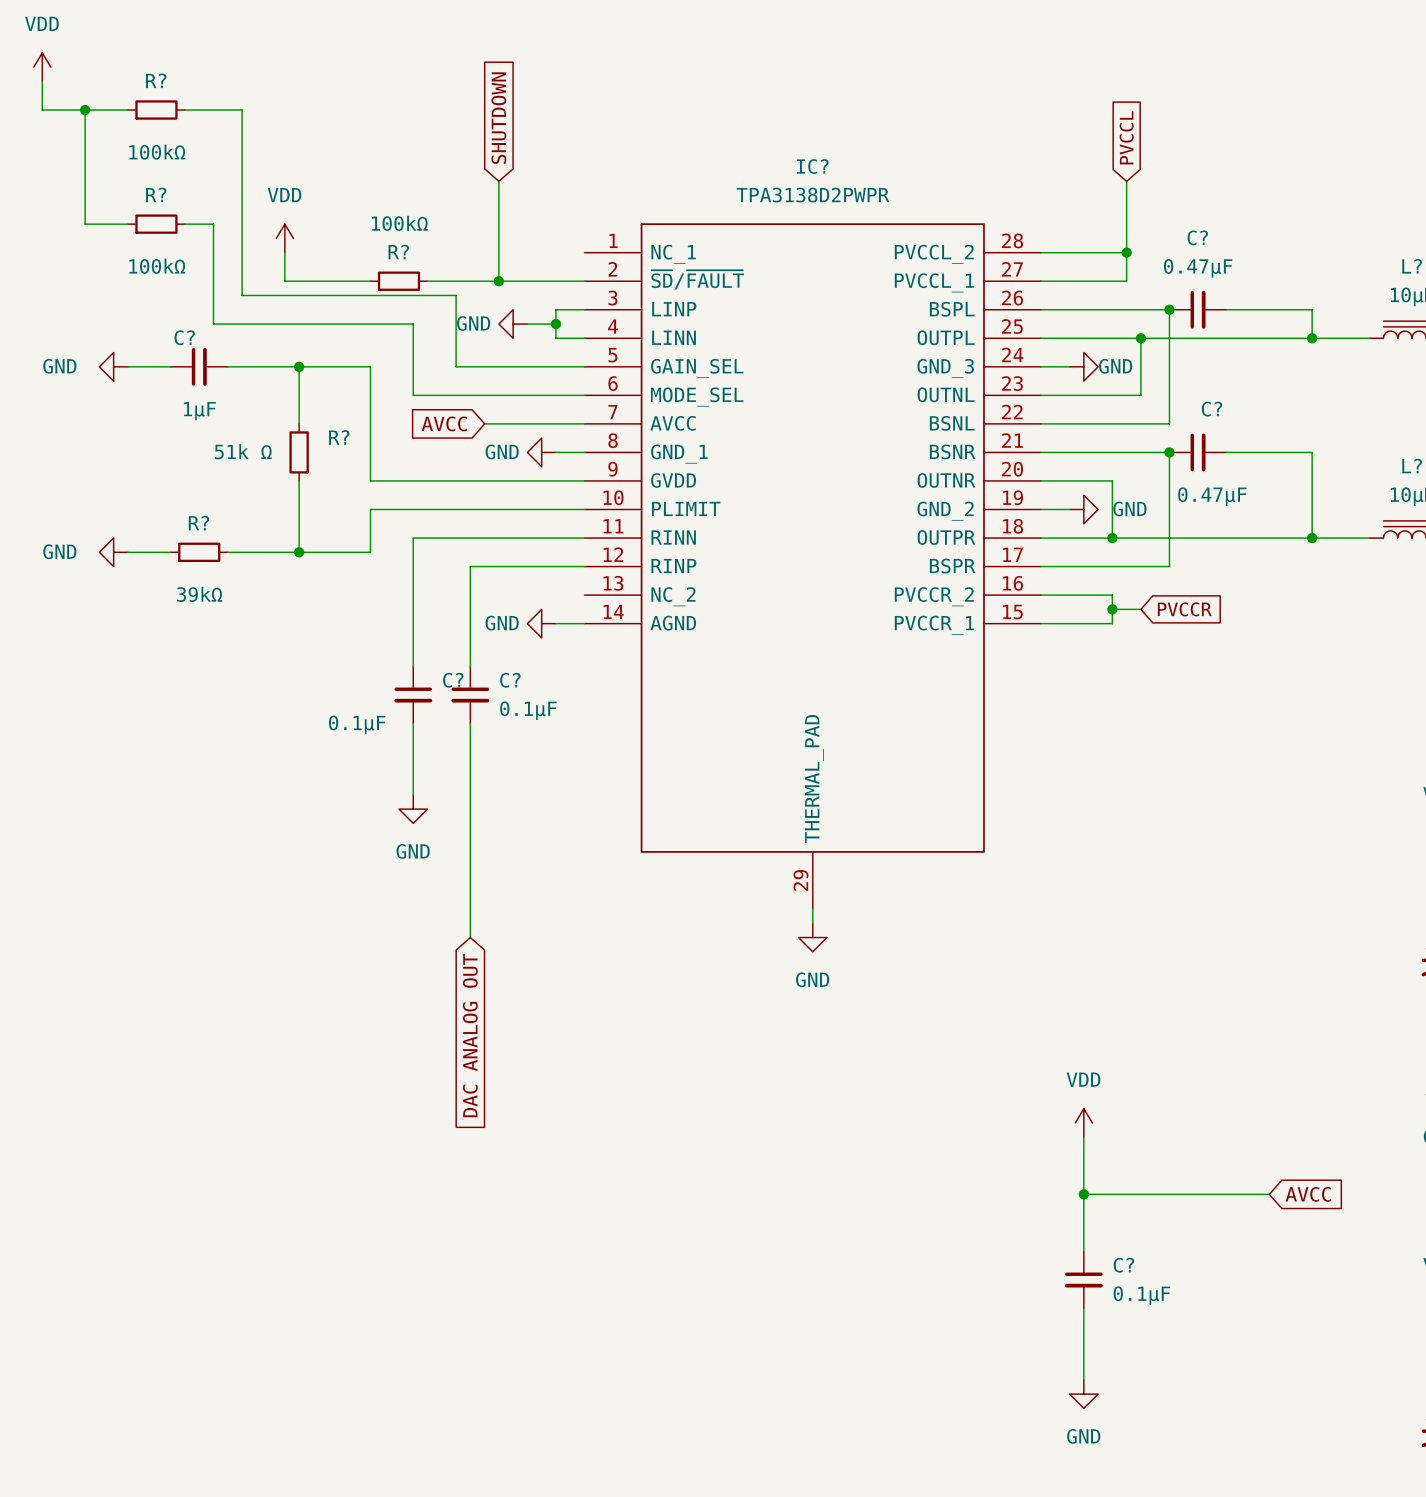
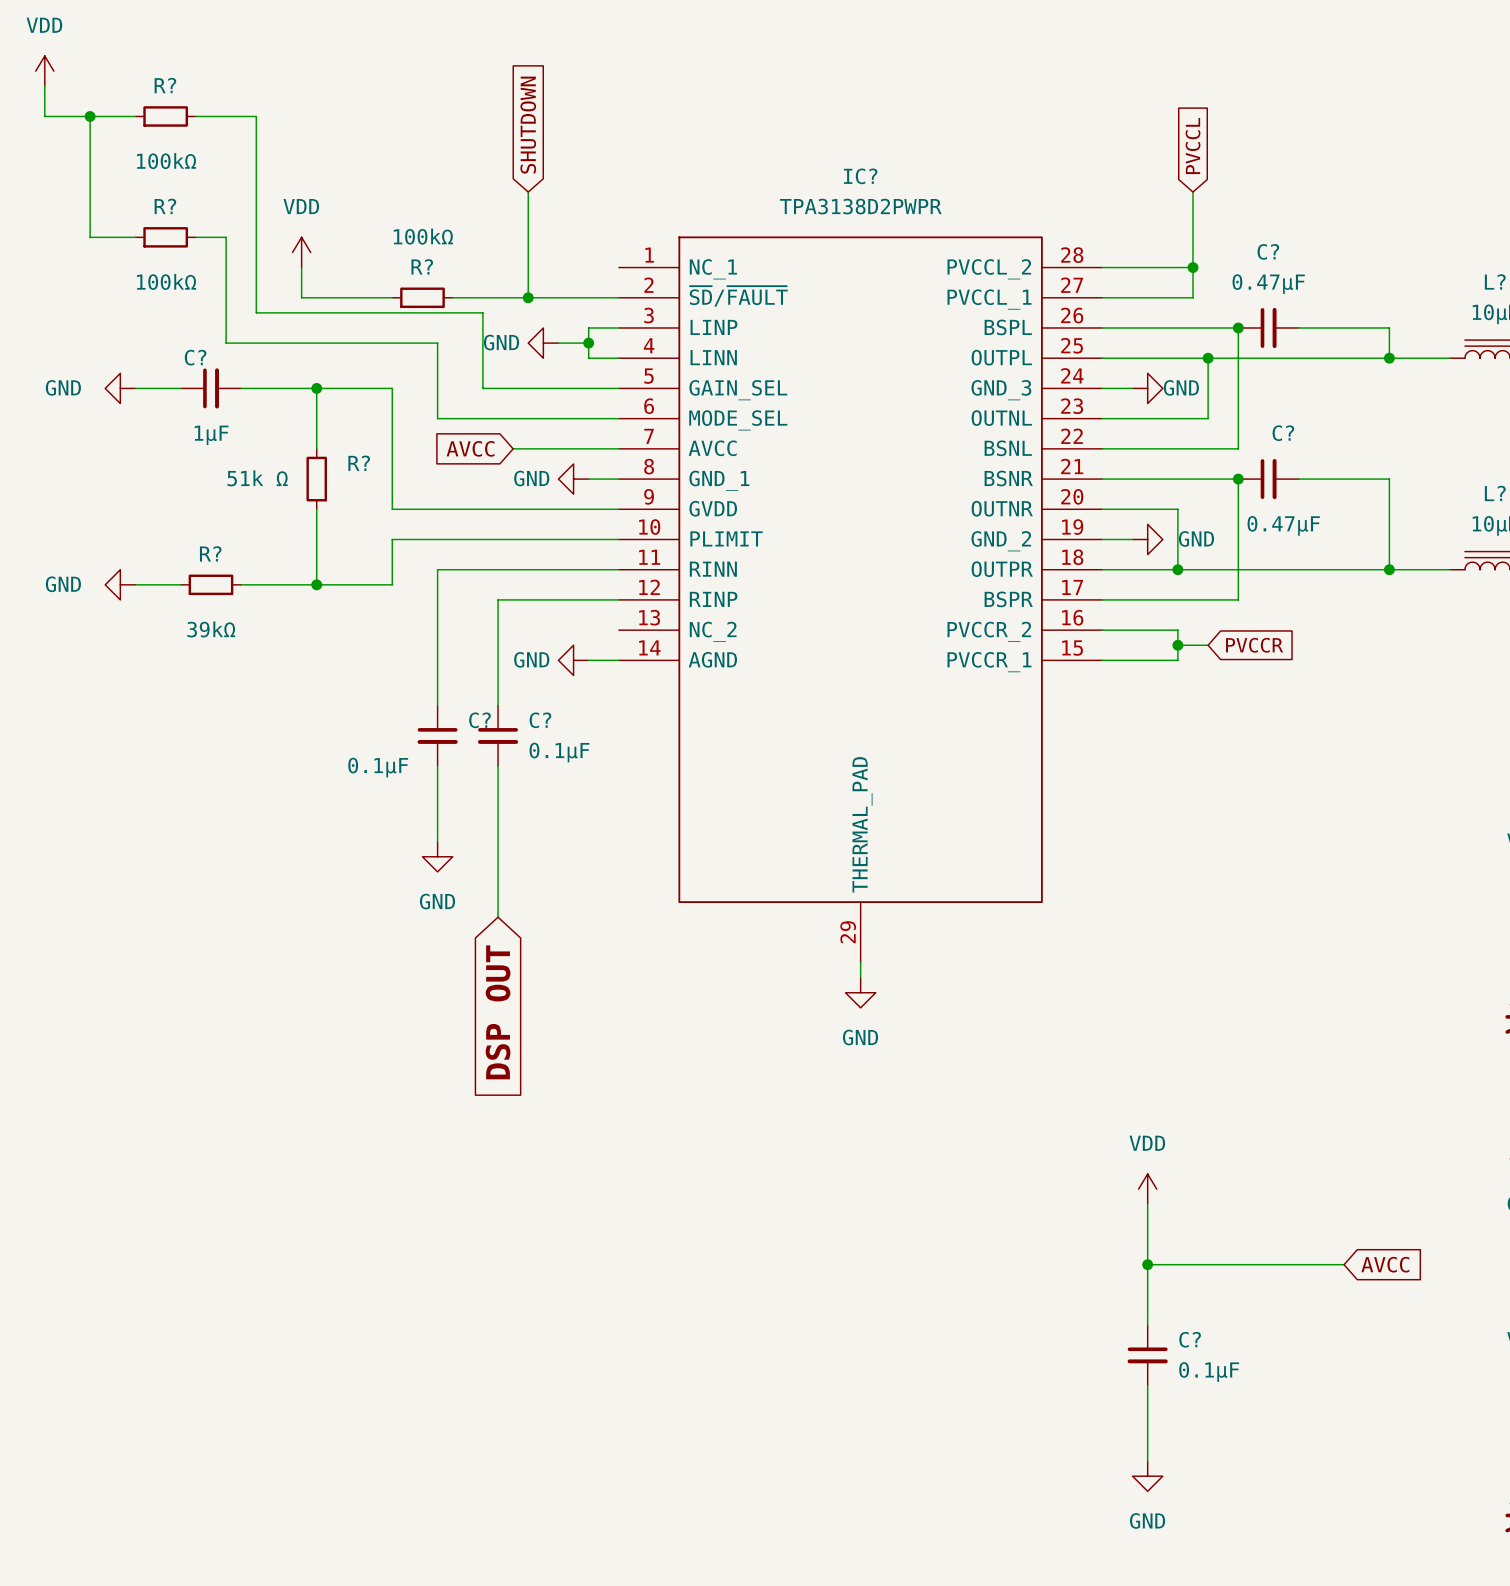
wire: (470, 866) (470, 937) -> none
global label: none -> DSP OUT (498, 1012)
global label: DAC ANALOG OUT (470, 1035) -> none

